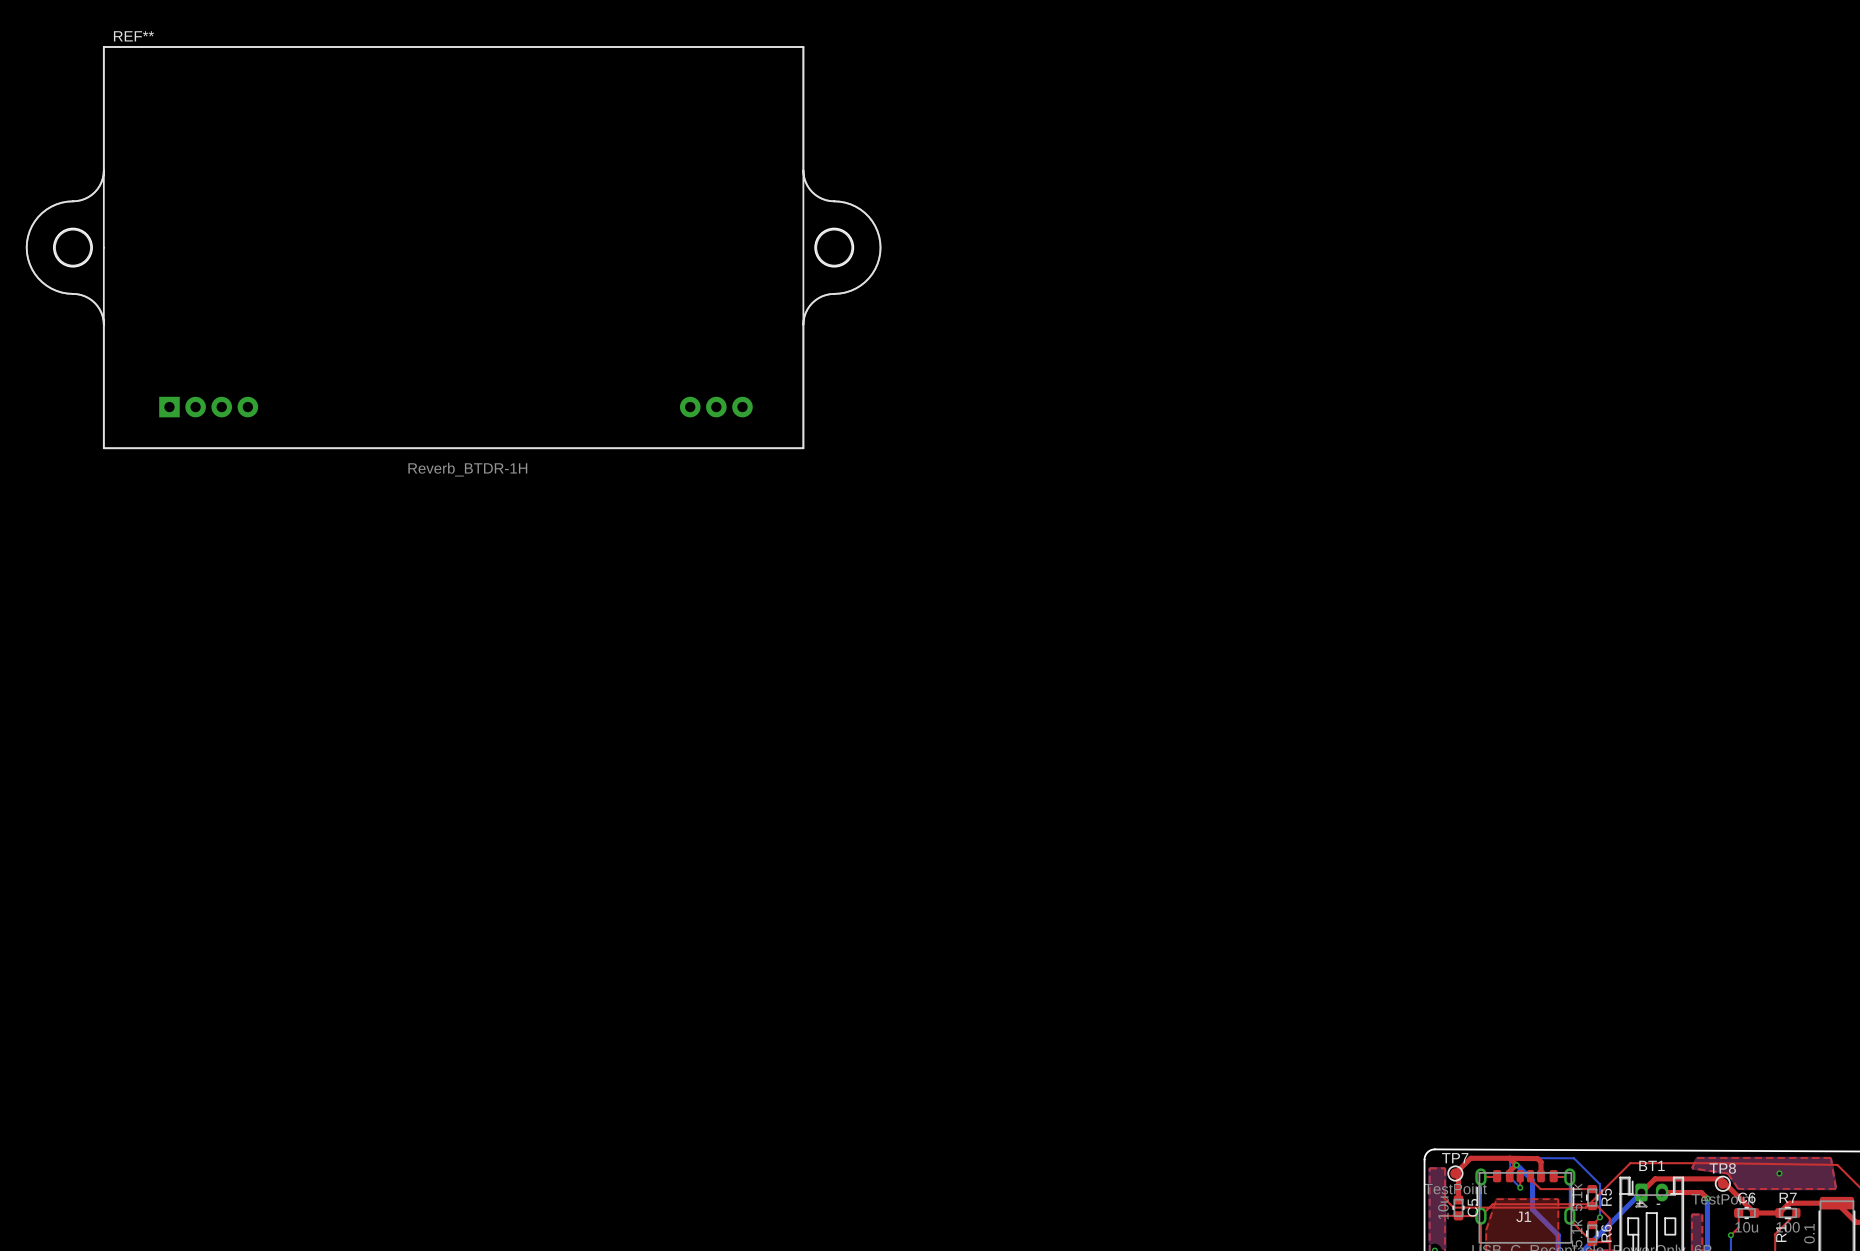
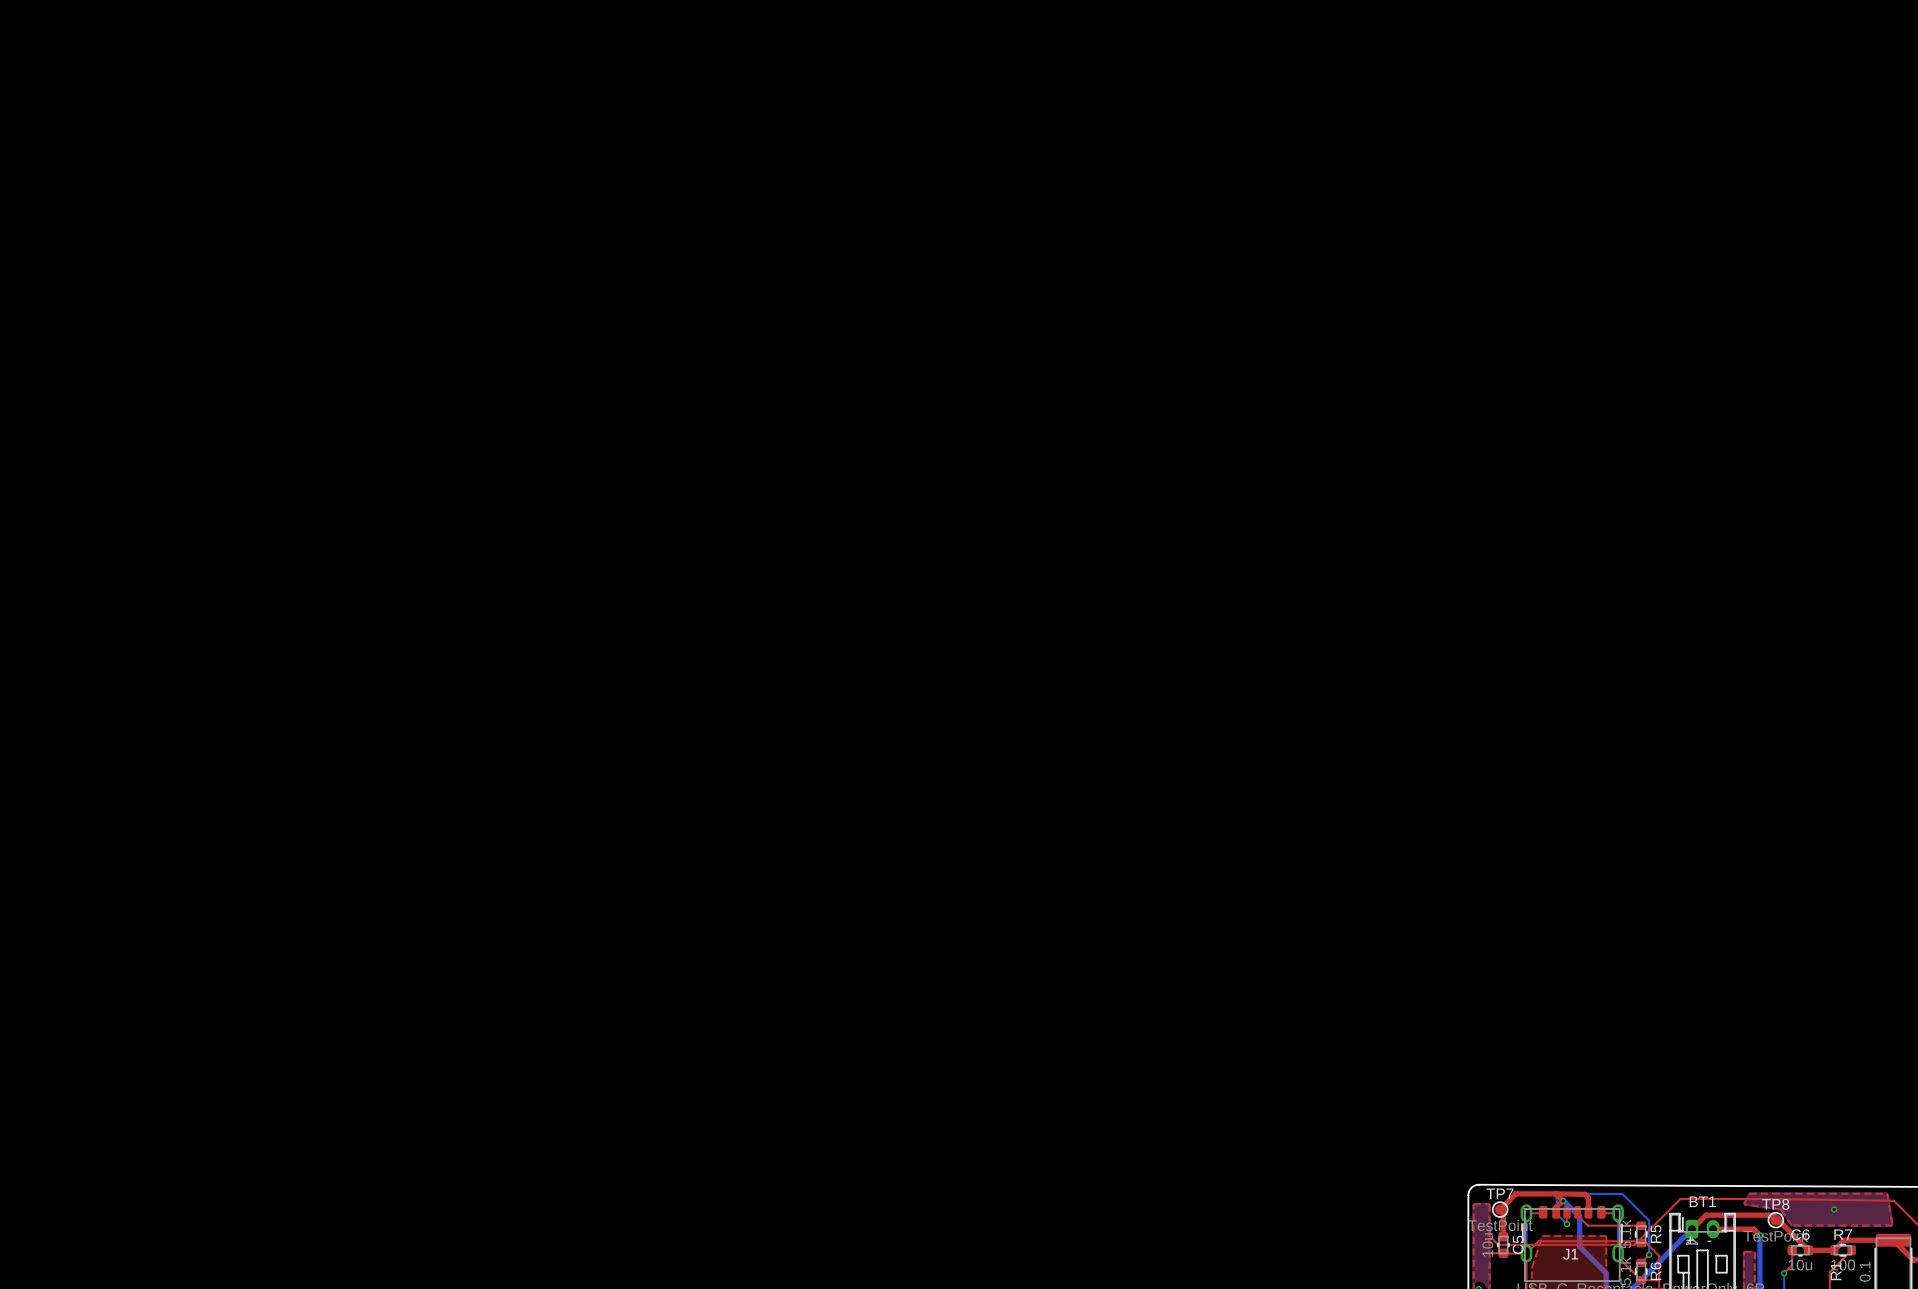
REF**: Reverb_BTDR-1H (453, 247) -> none

